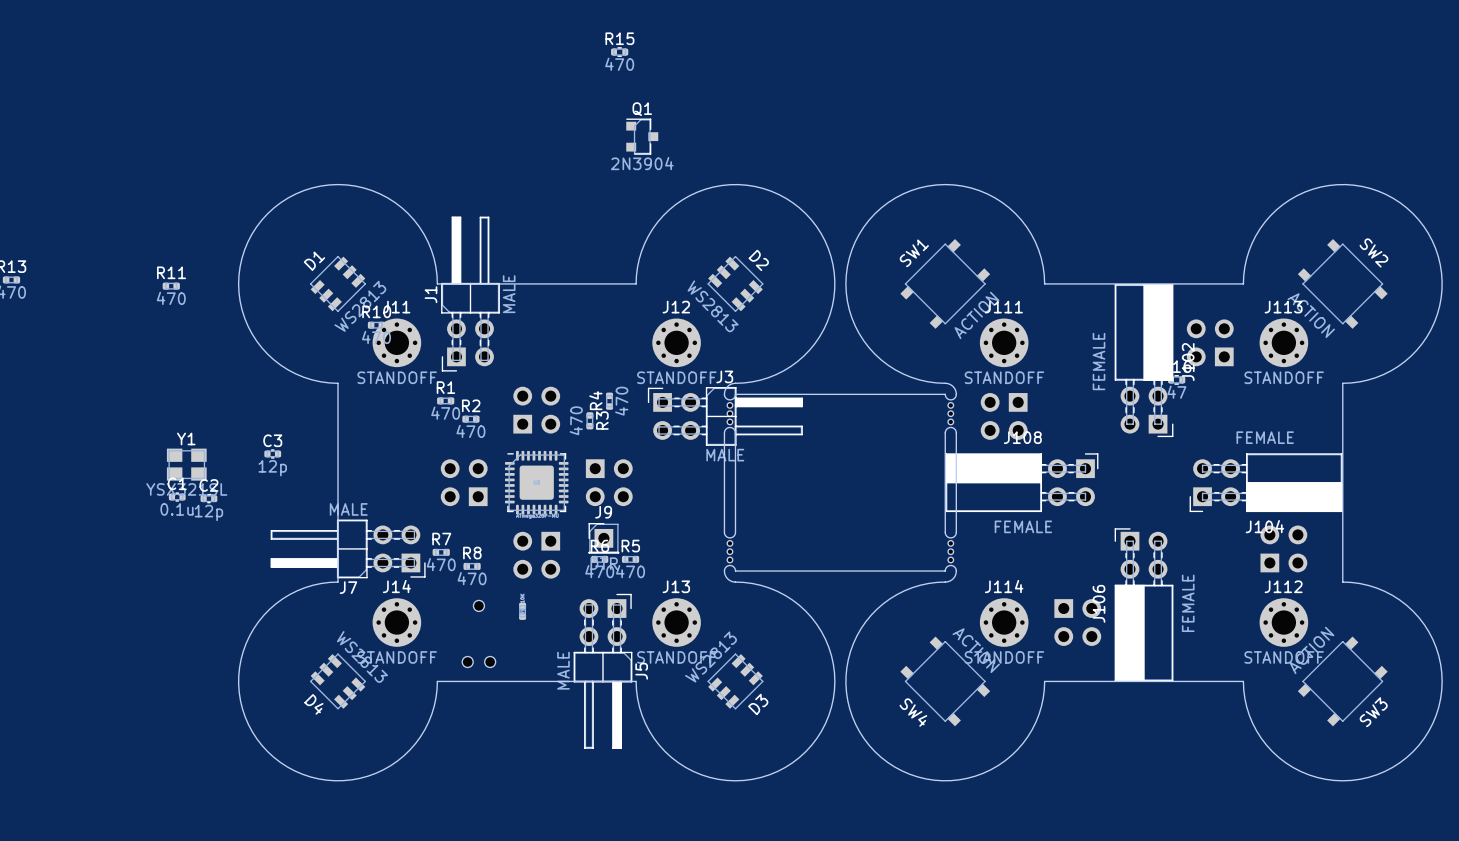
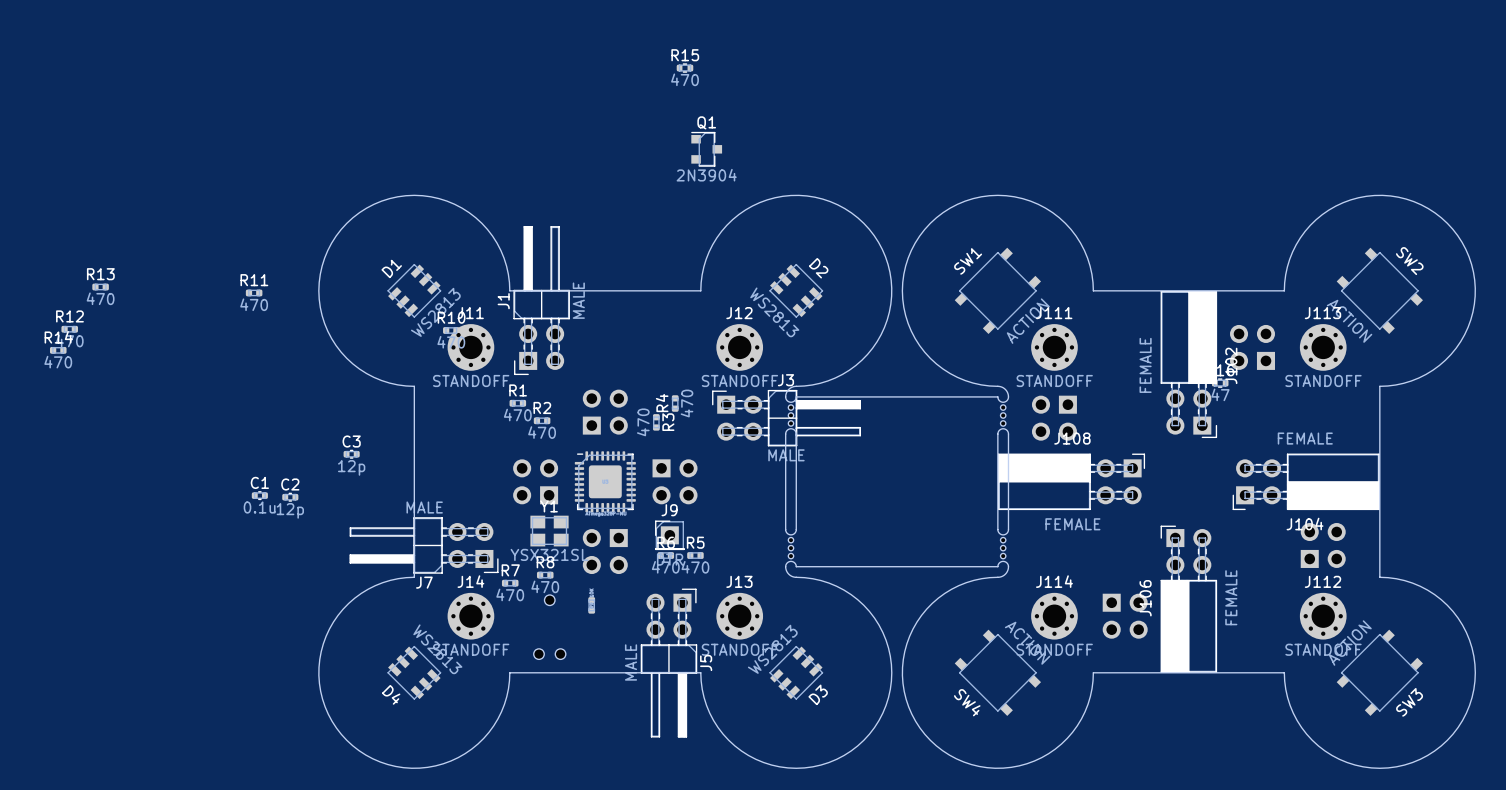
Y1 position: (186, 464) -> (549, 531)
R7 position: (441, 552) -> (510, 583)
R8 position: (472, 566) -> (545, 575)

